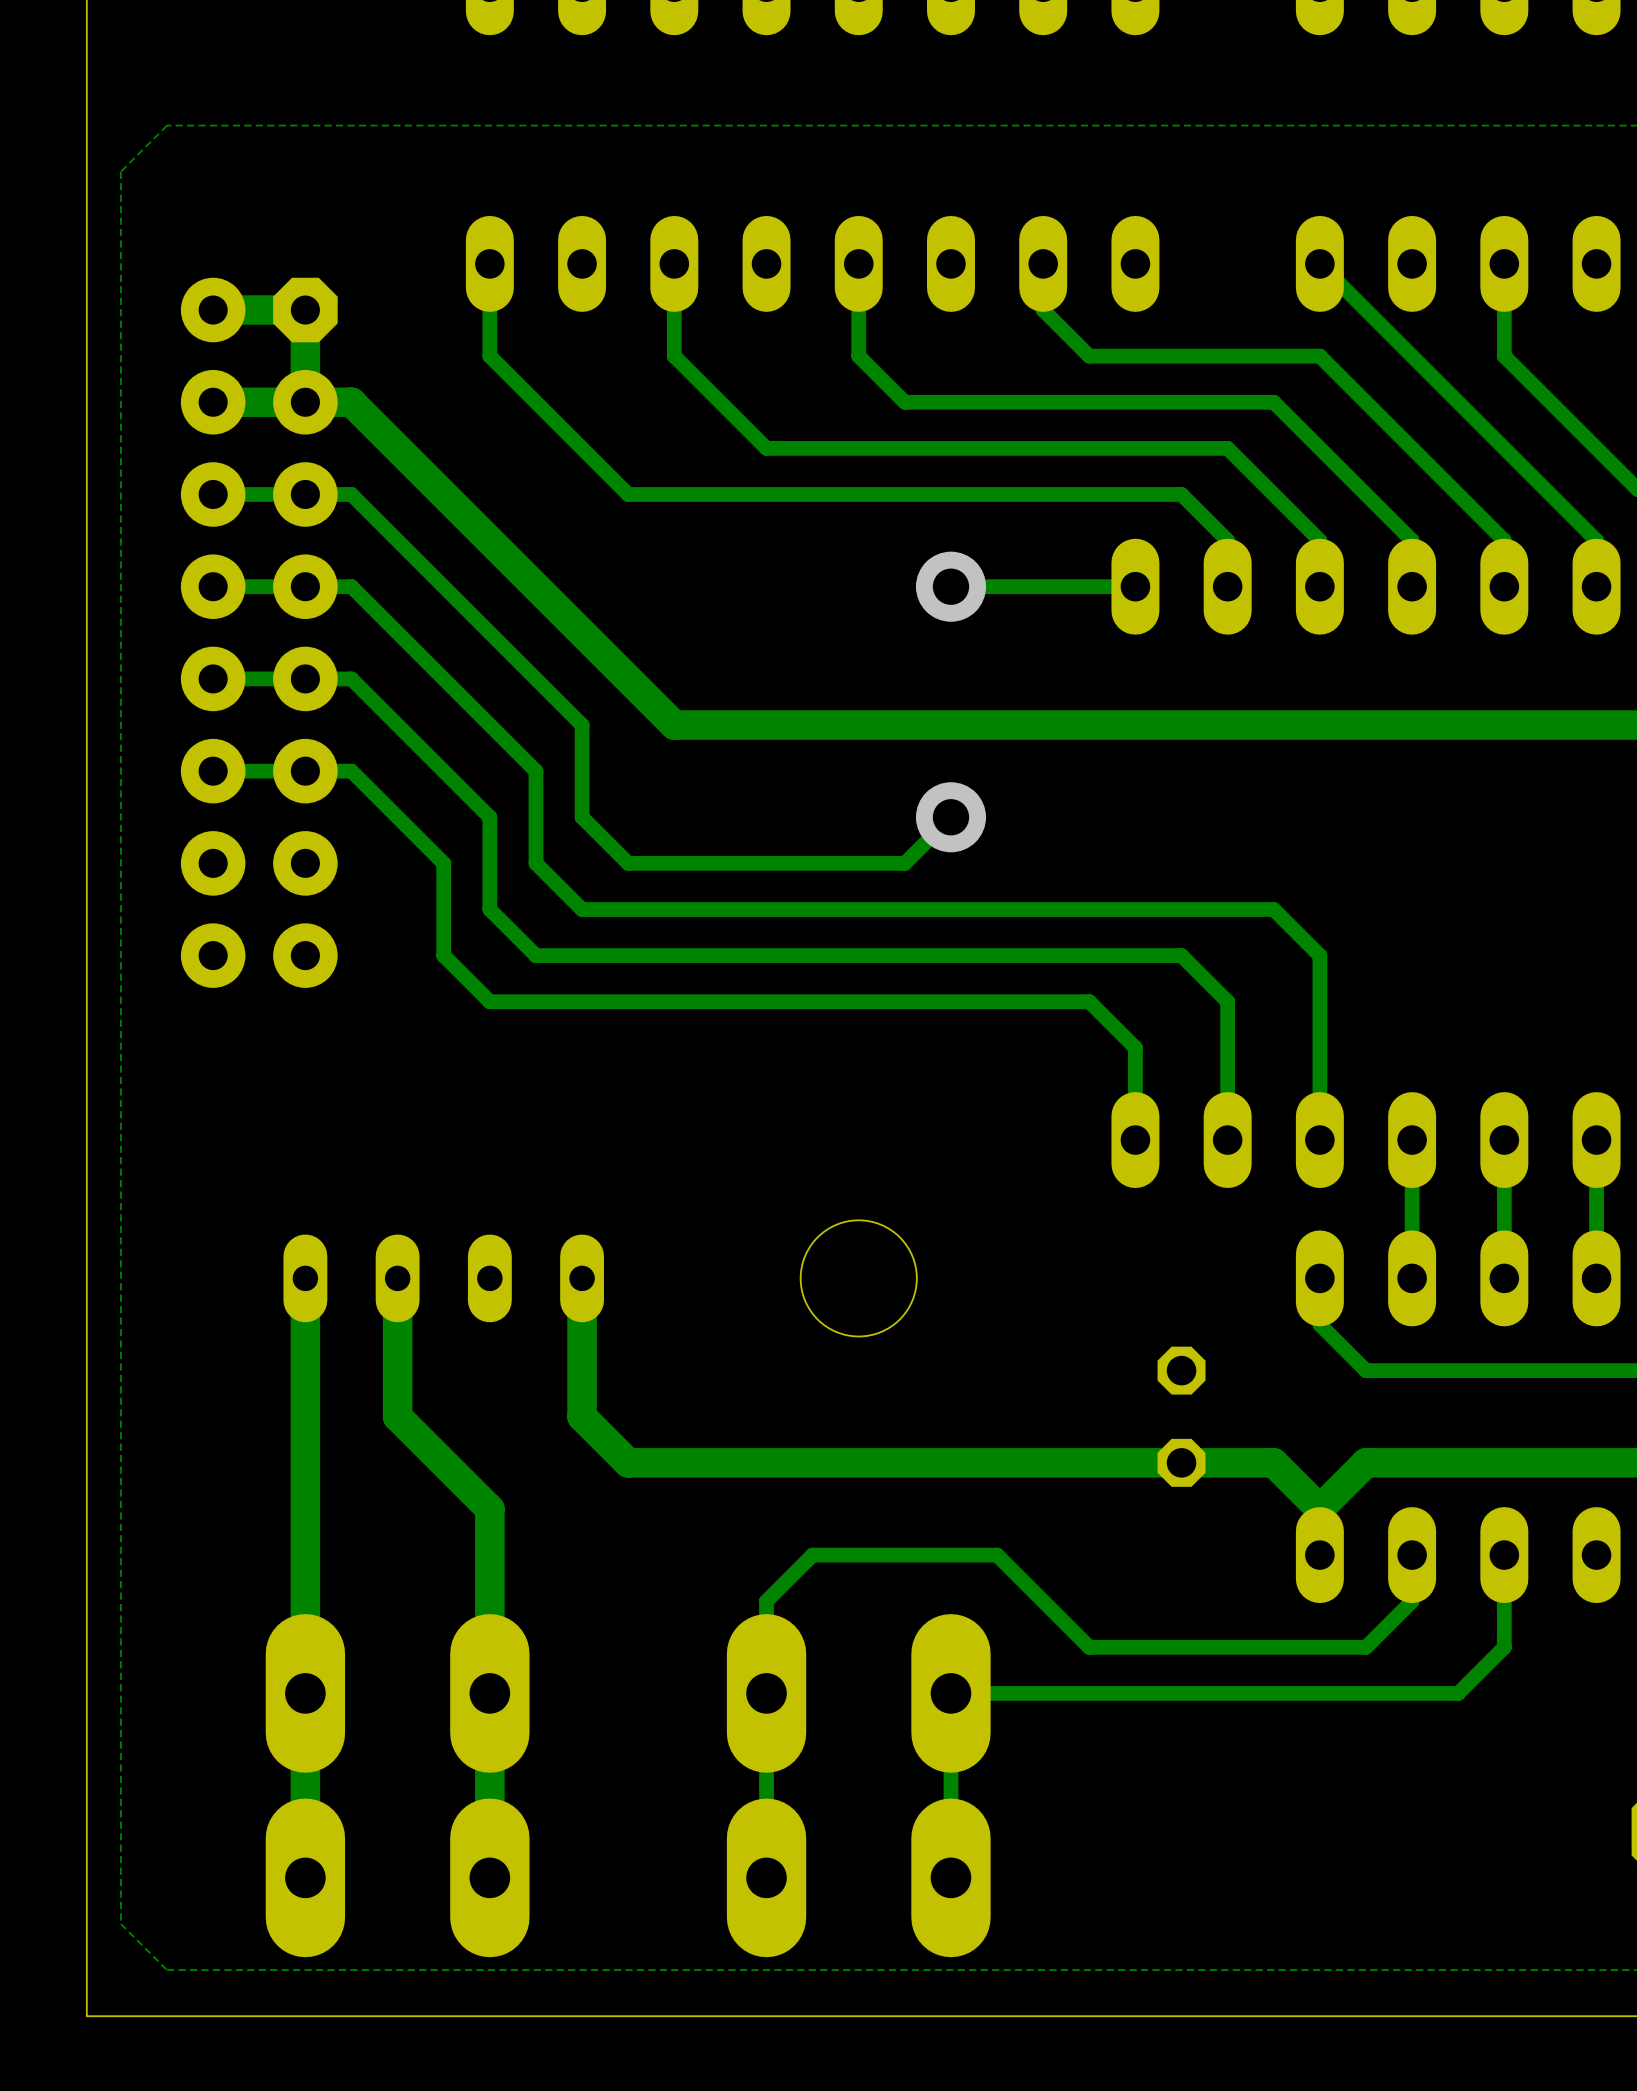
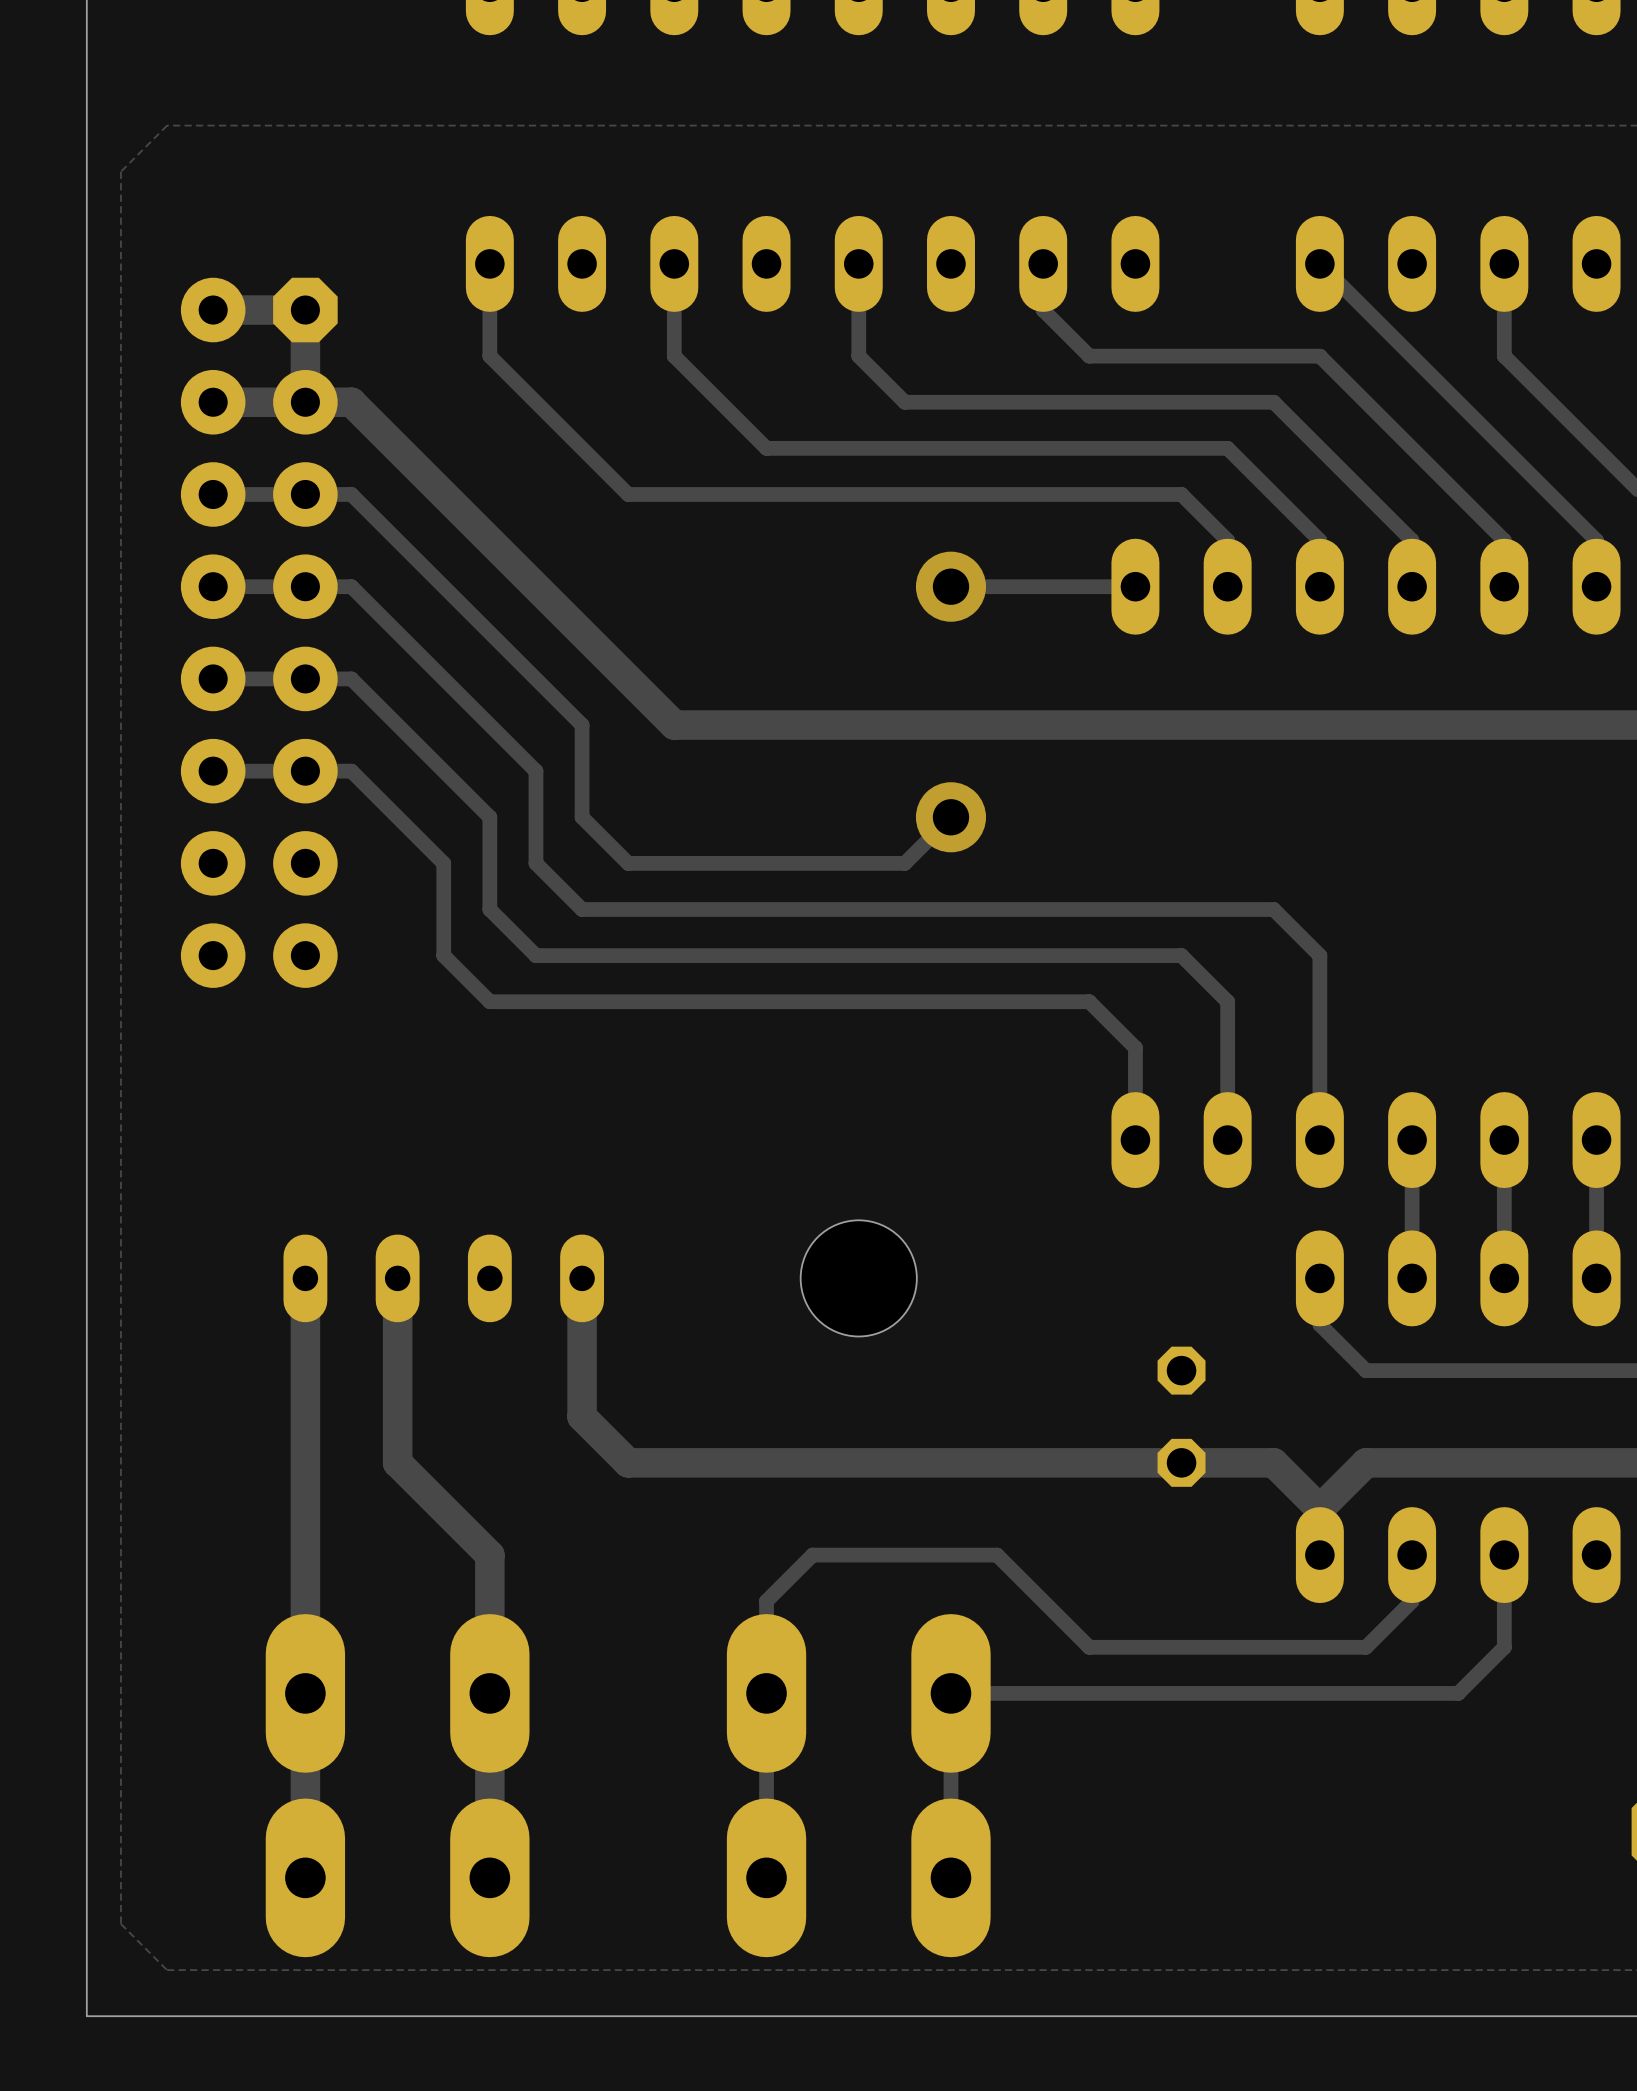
track: (397, 1416) (489, 1508) (489, 1555) -> (397, 1416) (397, 1462) (489, 1555)

